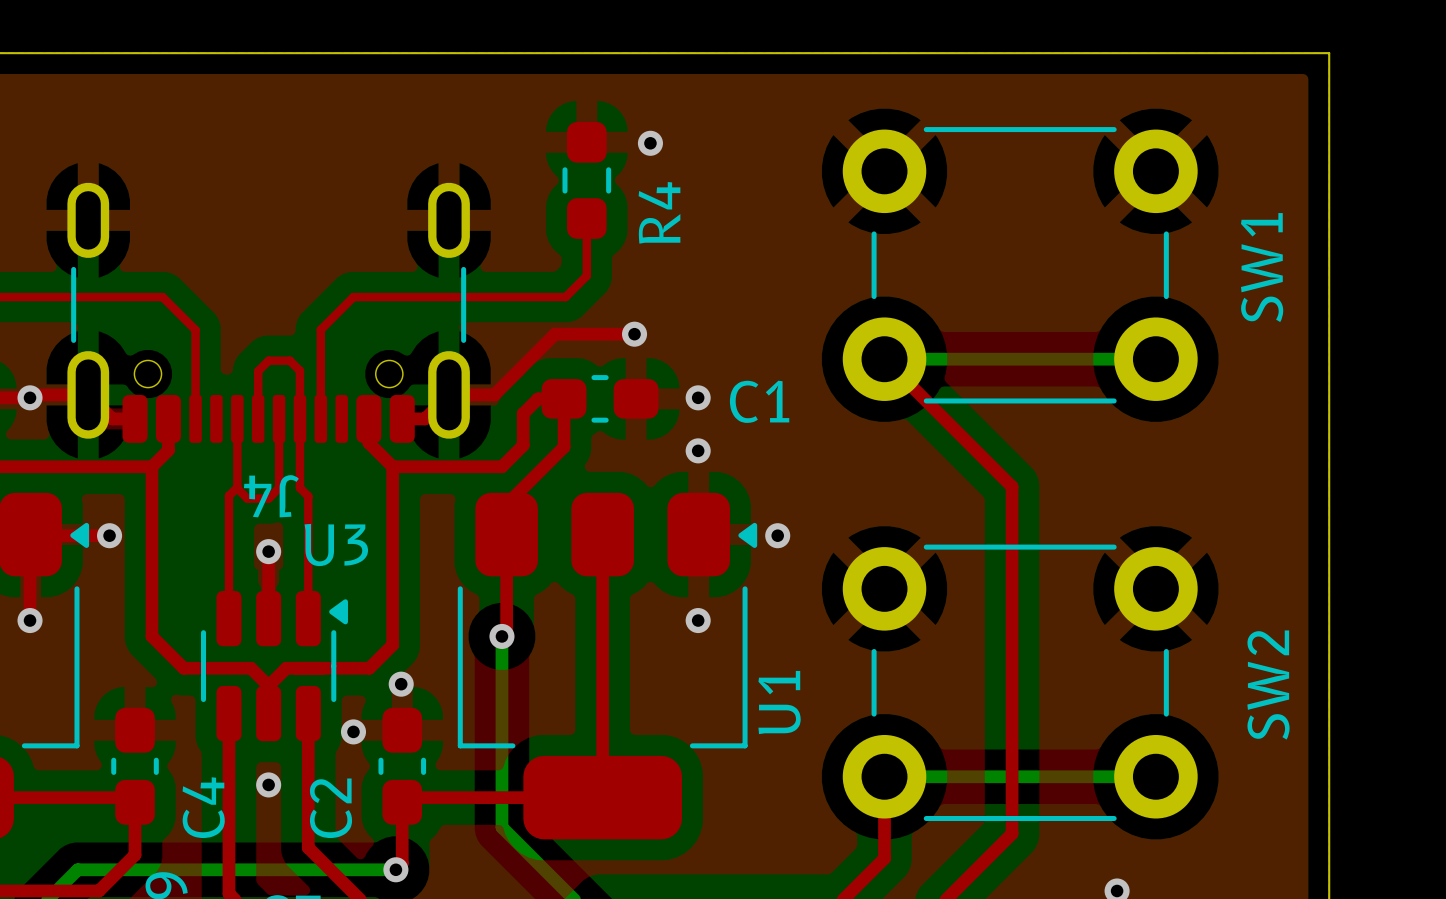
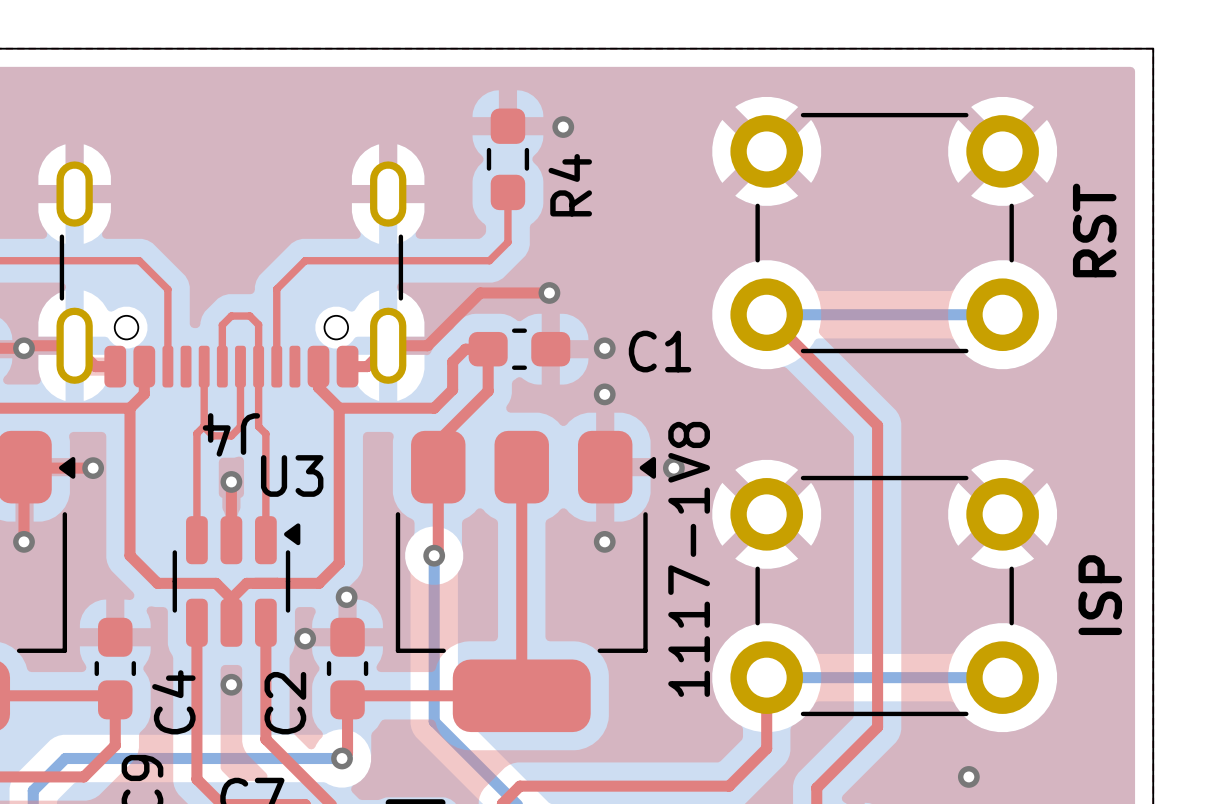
SW1 name: SW1 (1262, 267) -> RST (1094, 230)
SW2 name: SW2 (1268, 685) -> ISP (1100, 595)
U1 name: U1 (779, 702) -> 1117-1V8 (689, 559)

